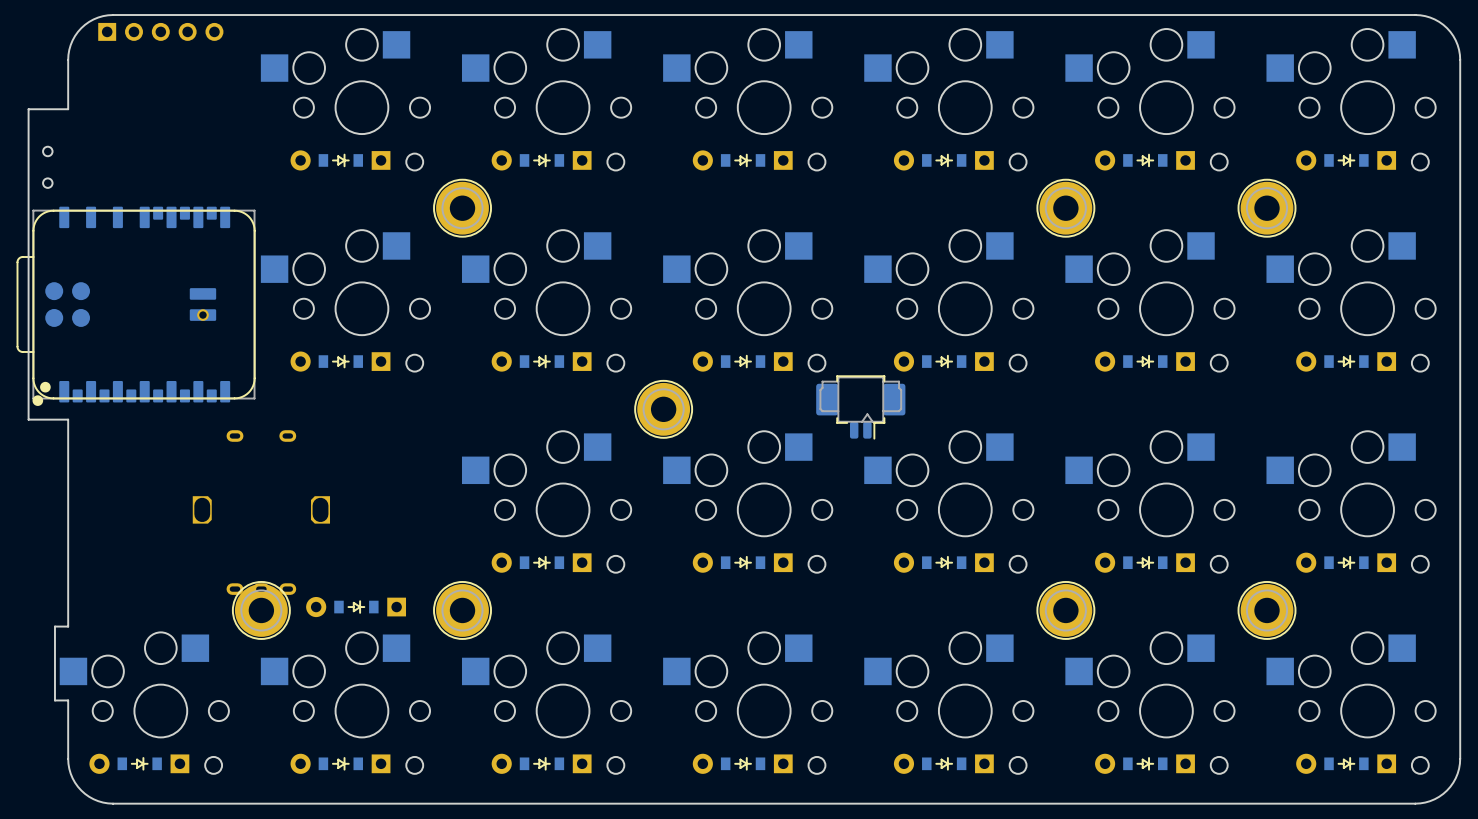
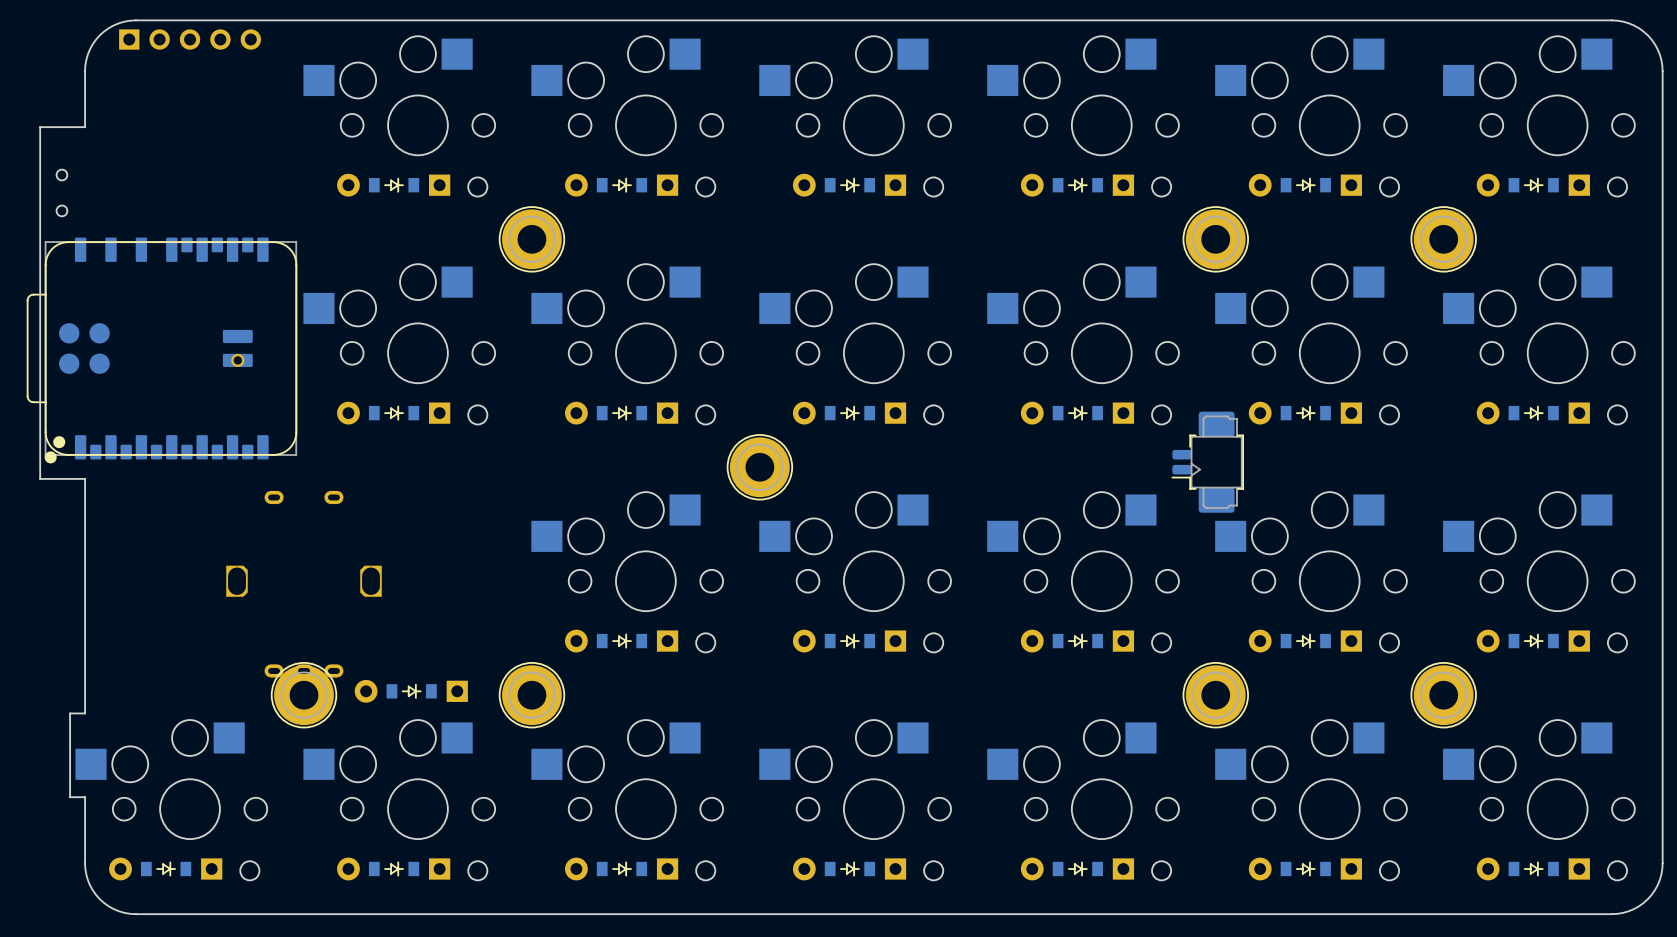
part rotation: 0° (860, 407) -> 90° clockwise (1207, 462)
part position: (860, 407) -> (1207, 462)

